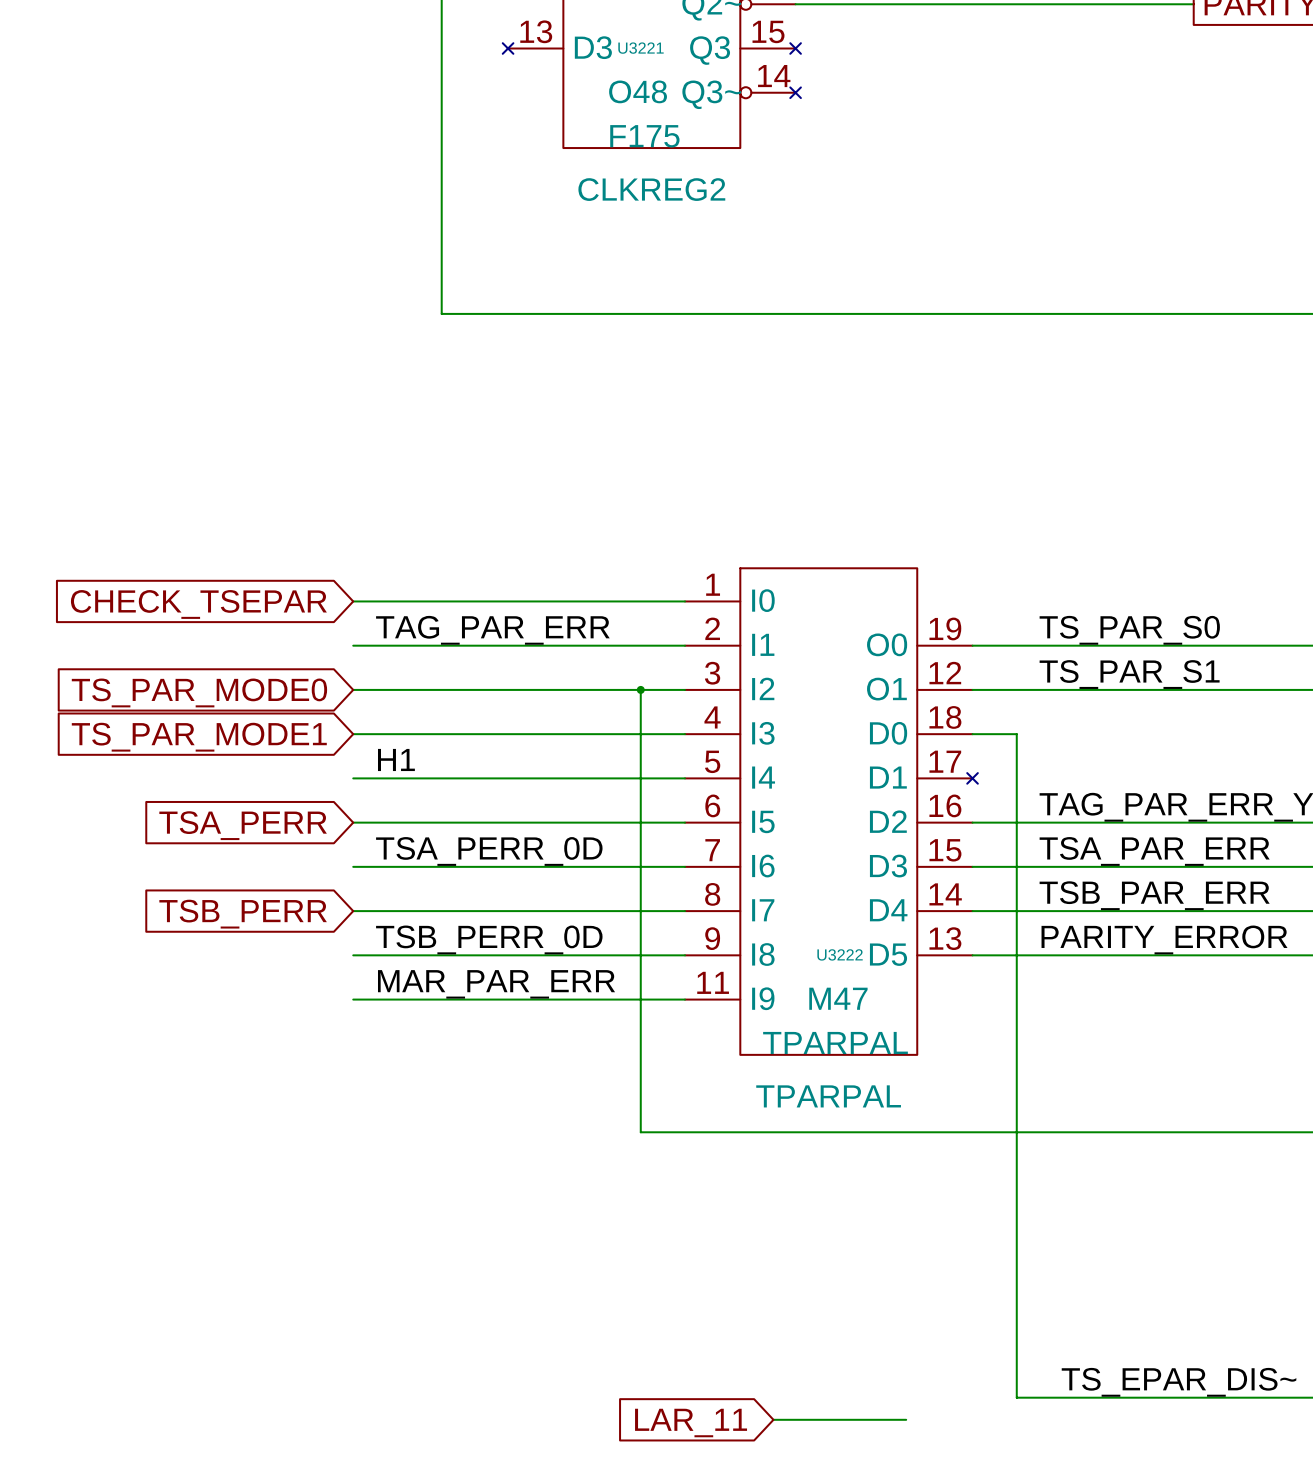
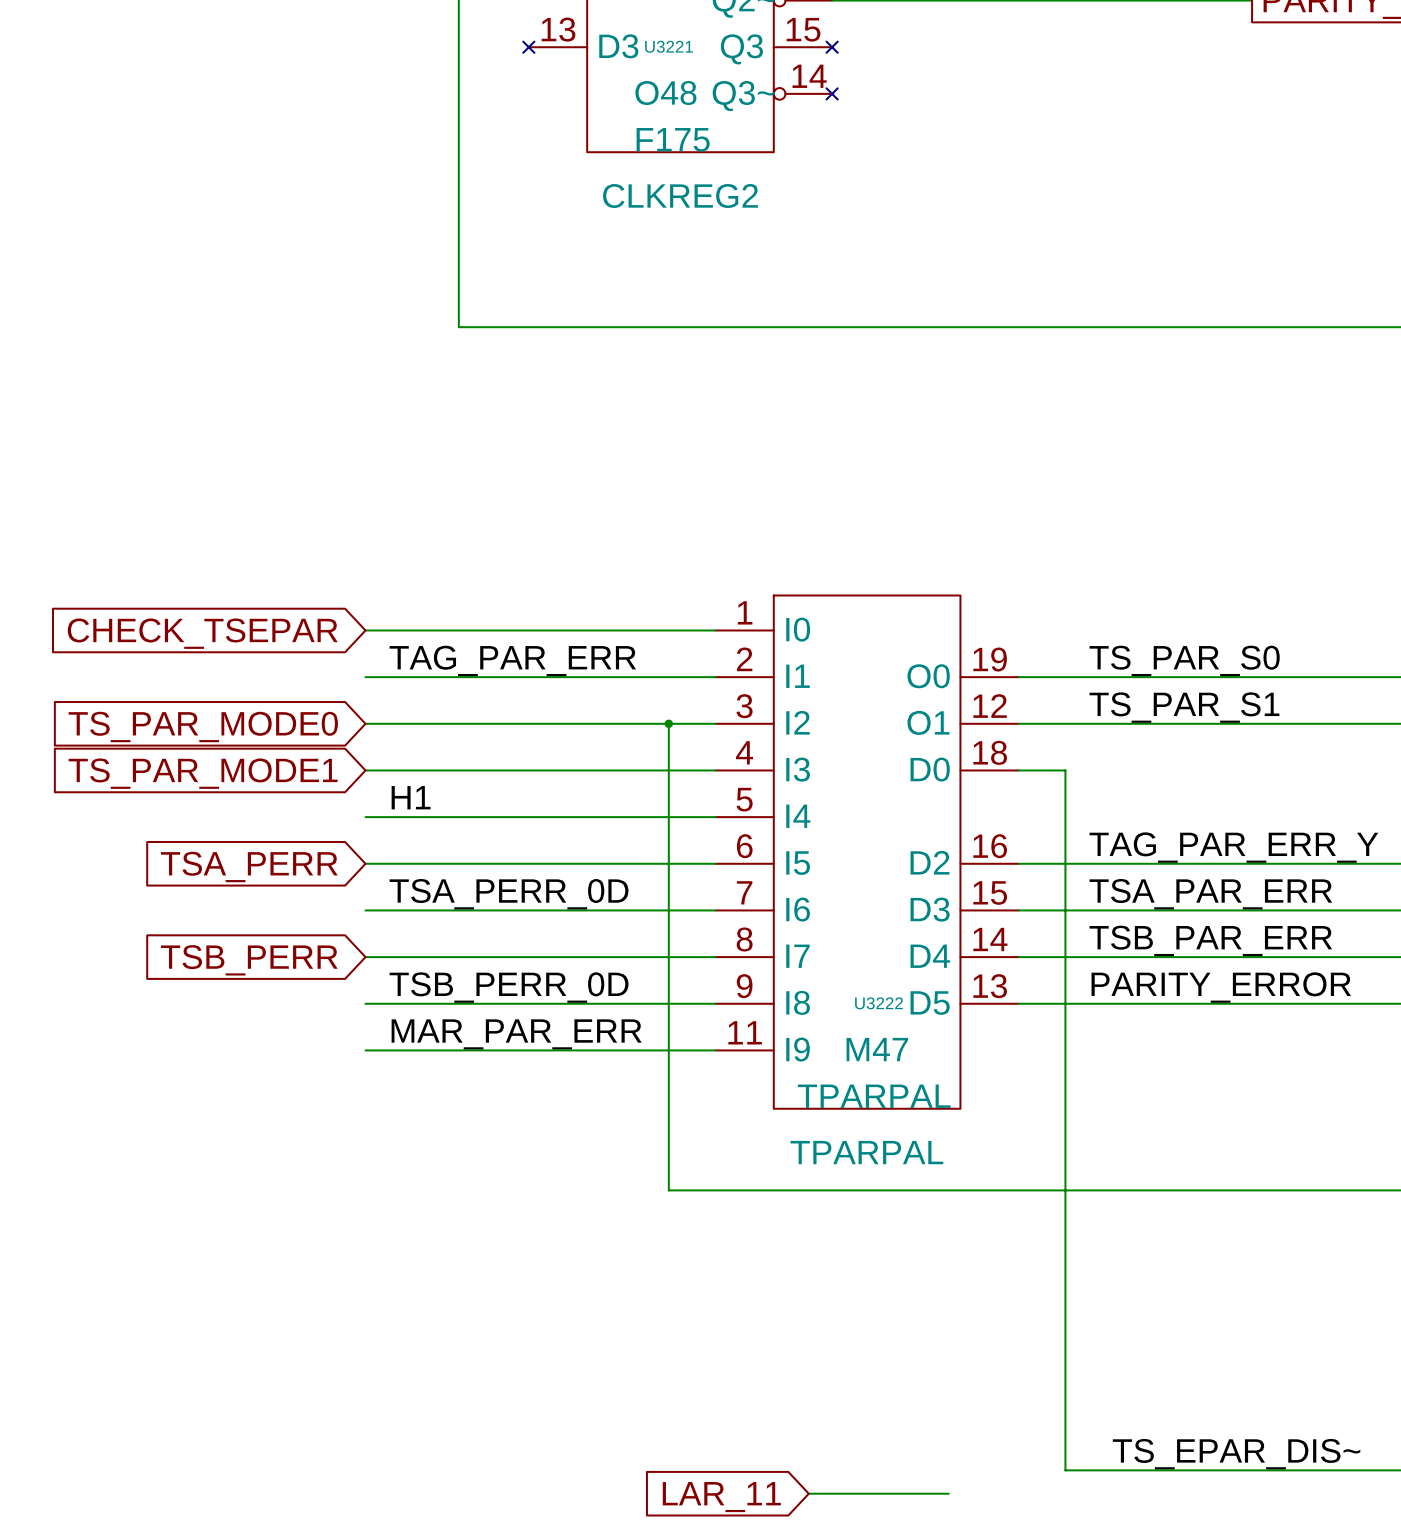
U3222 symbol: [685, 568, 973, 1055] -> [715, 595, 1019, 1109]
no-connect mark: (972, 778) -> none

